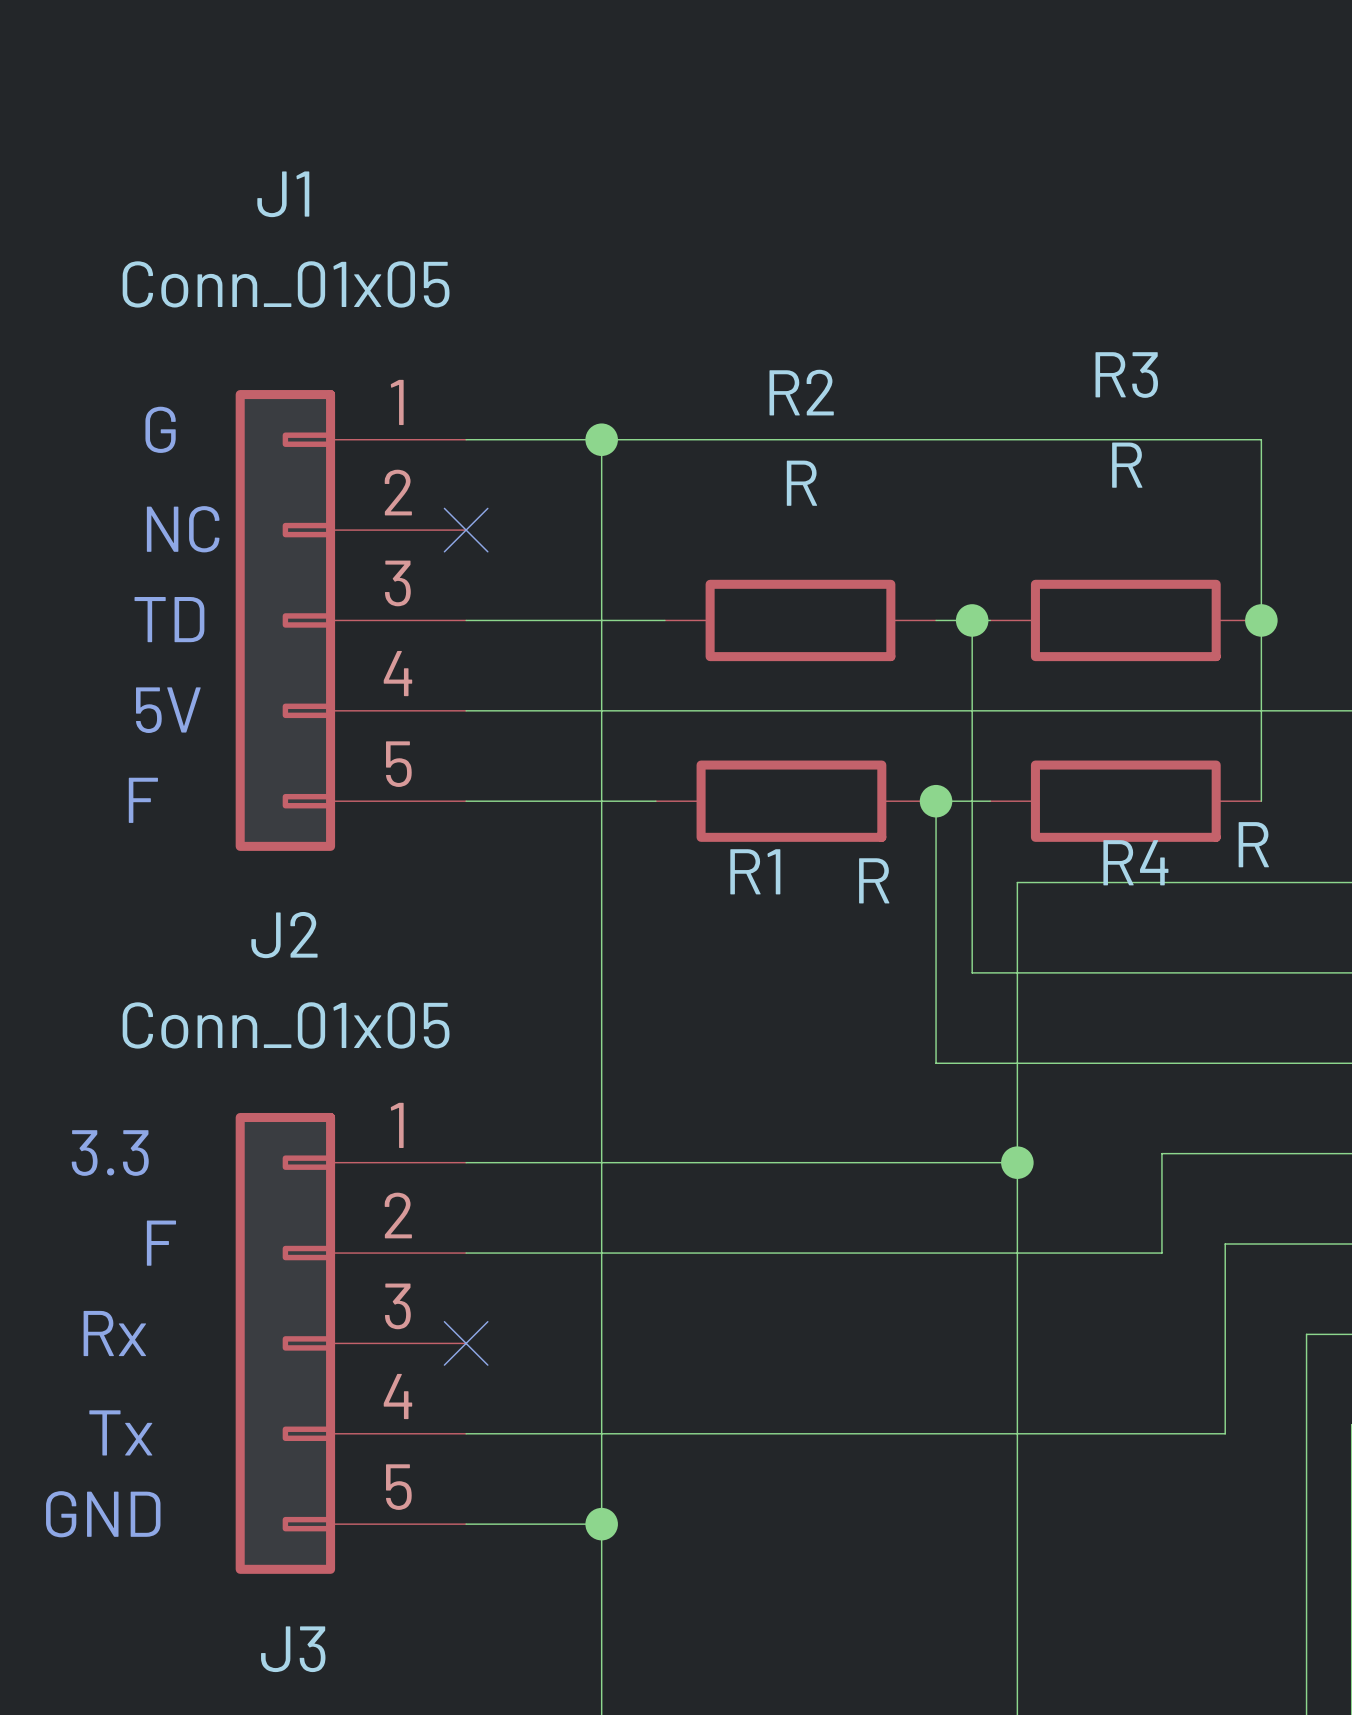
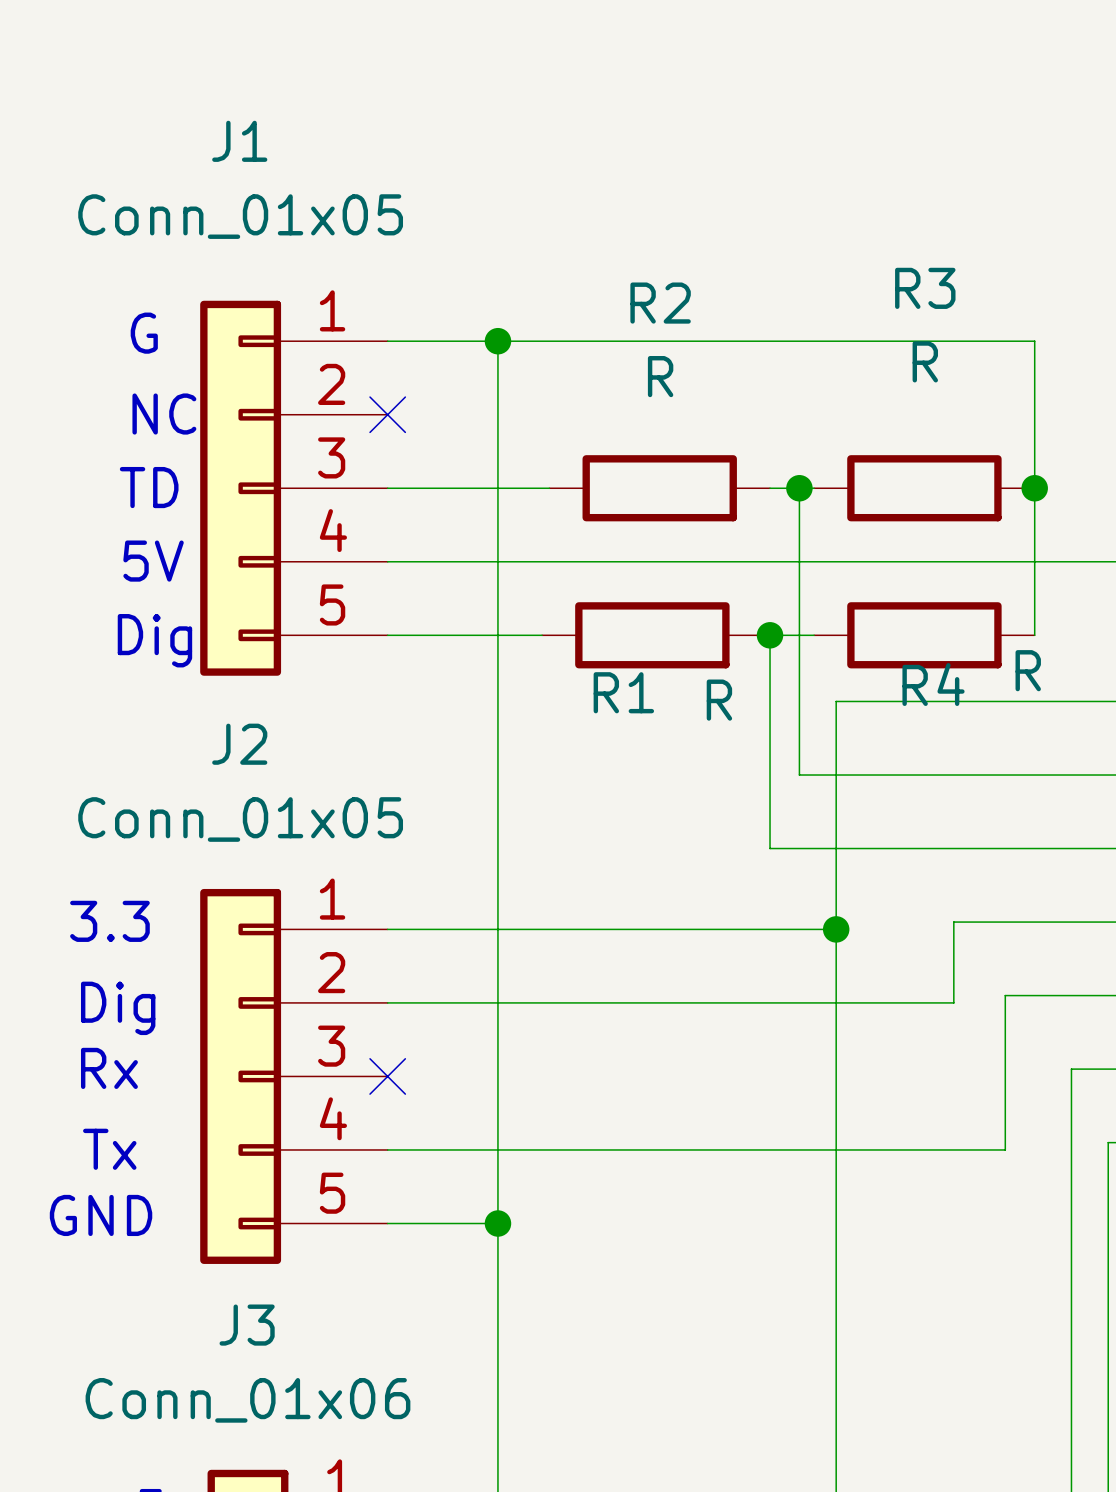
text: F (143, 800) -> Dig (154, 640)
text: F (161, 1243) -> none
text: none -> Dig (118, 1008)

